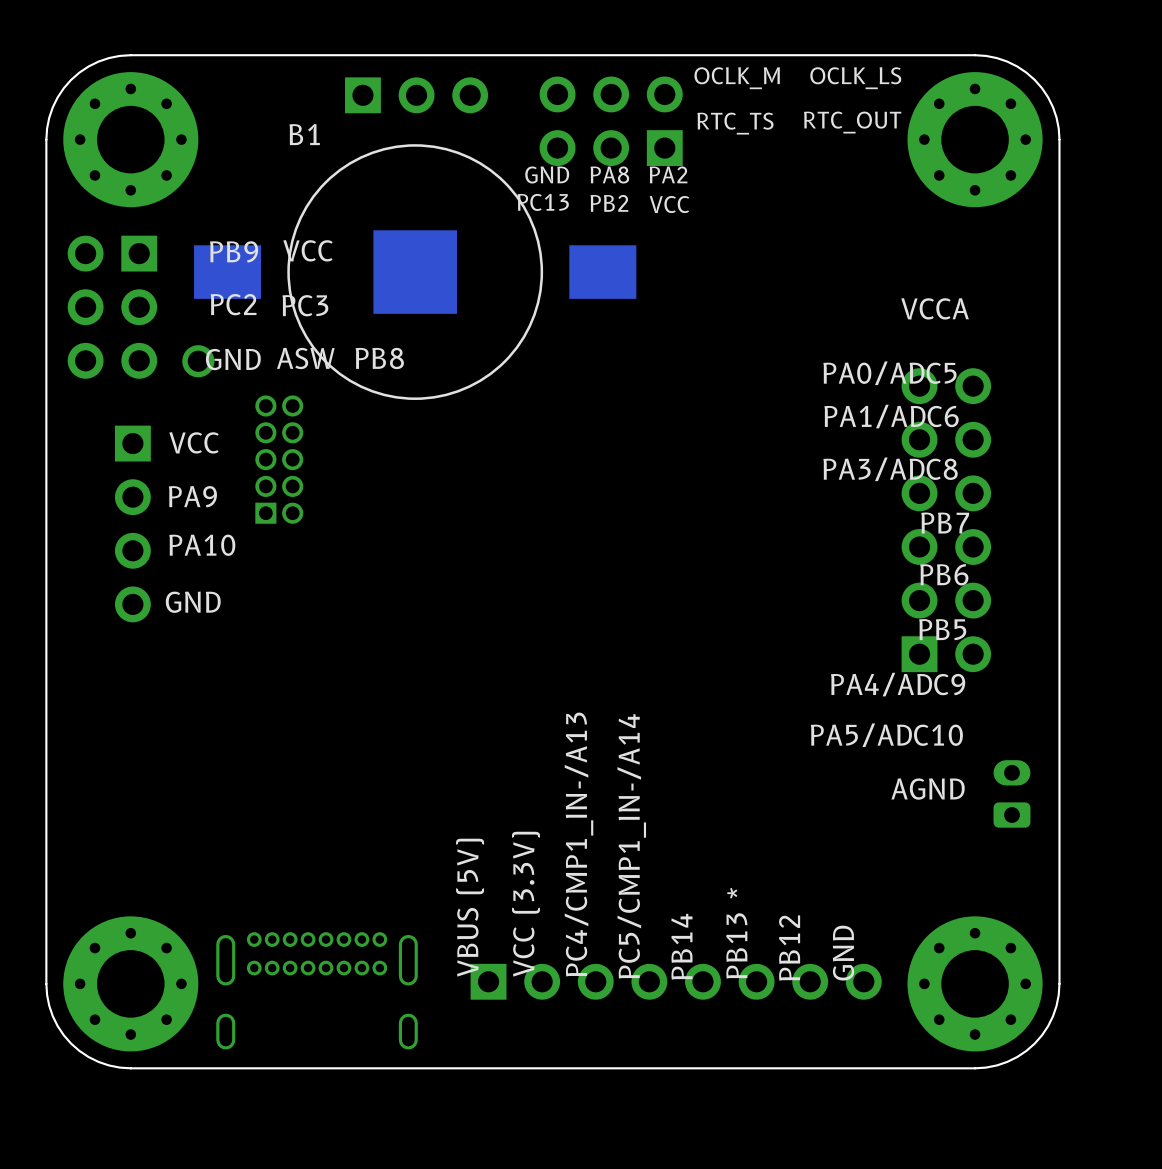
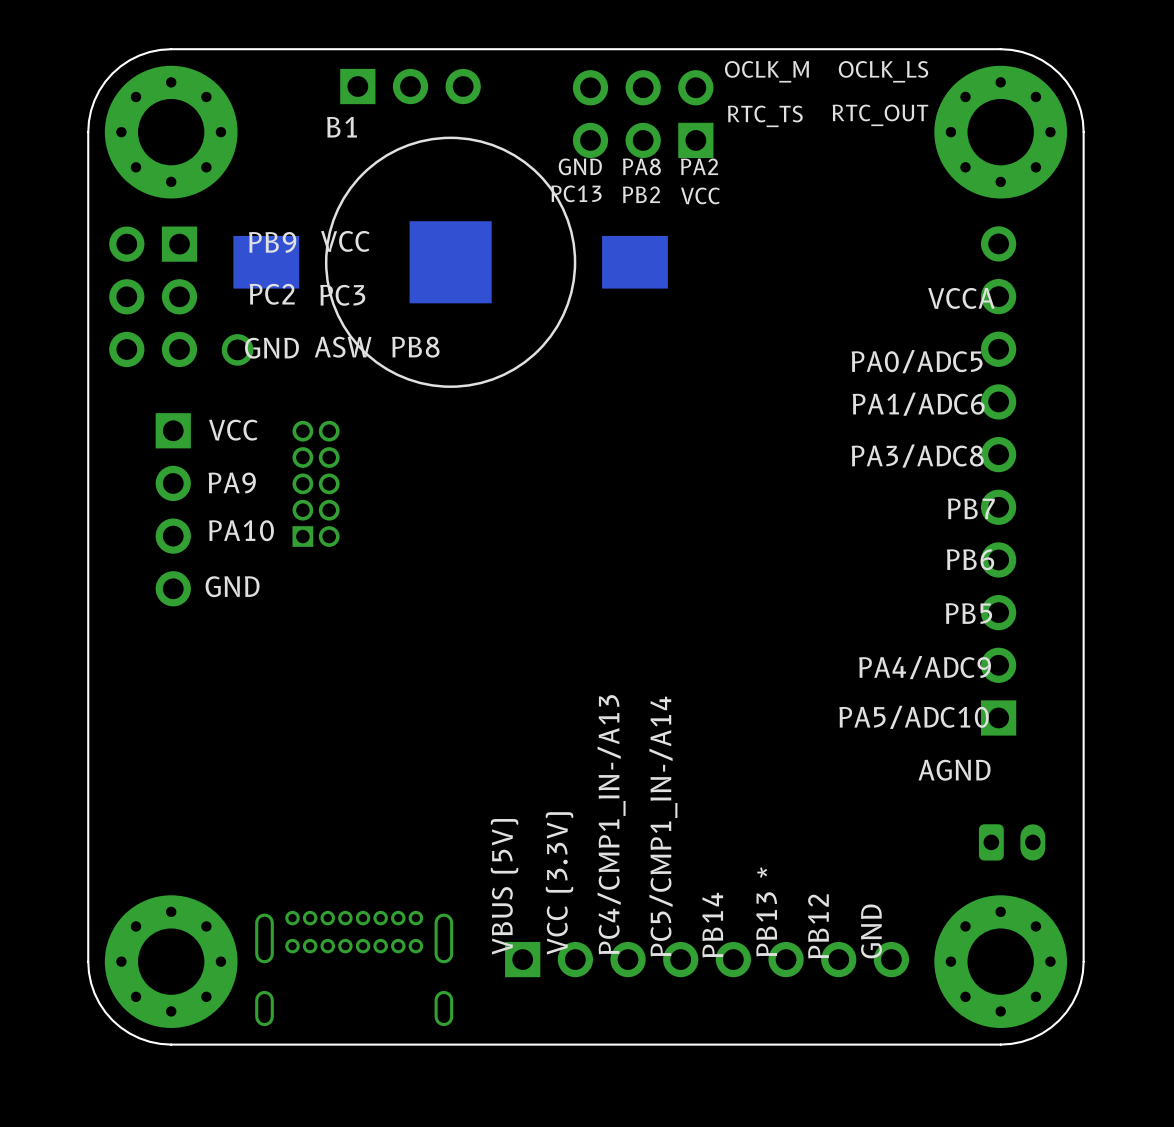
part position: (416, 95) -> (410, 86)
part position: (279, 459) -> (316, 483)
part: none -> (998, 480)
part: (946, 520) -> none
part rotation: 0° (1011, 793) -> 90° clockwise (1012, 842)
part position: (1011, 793) -> (1012, 842)

